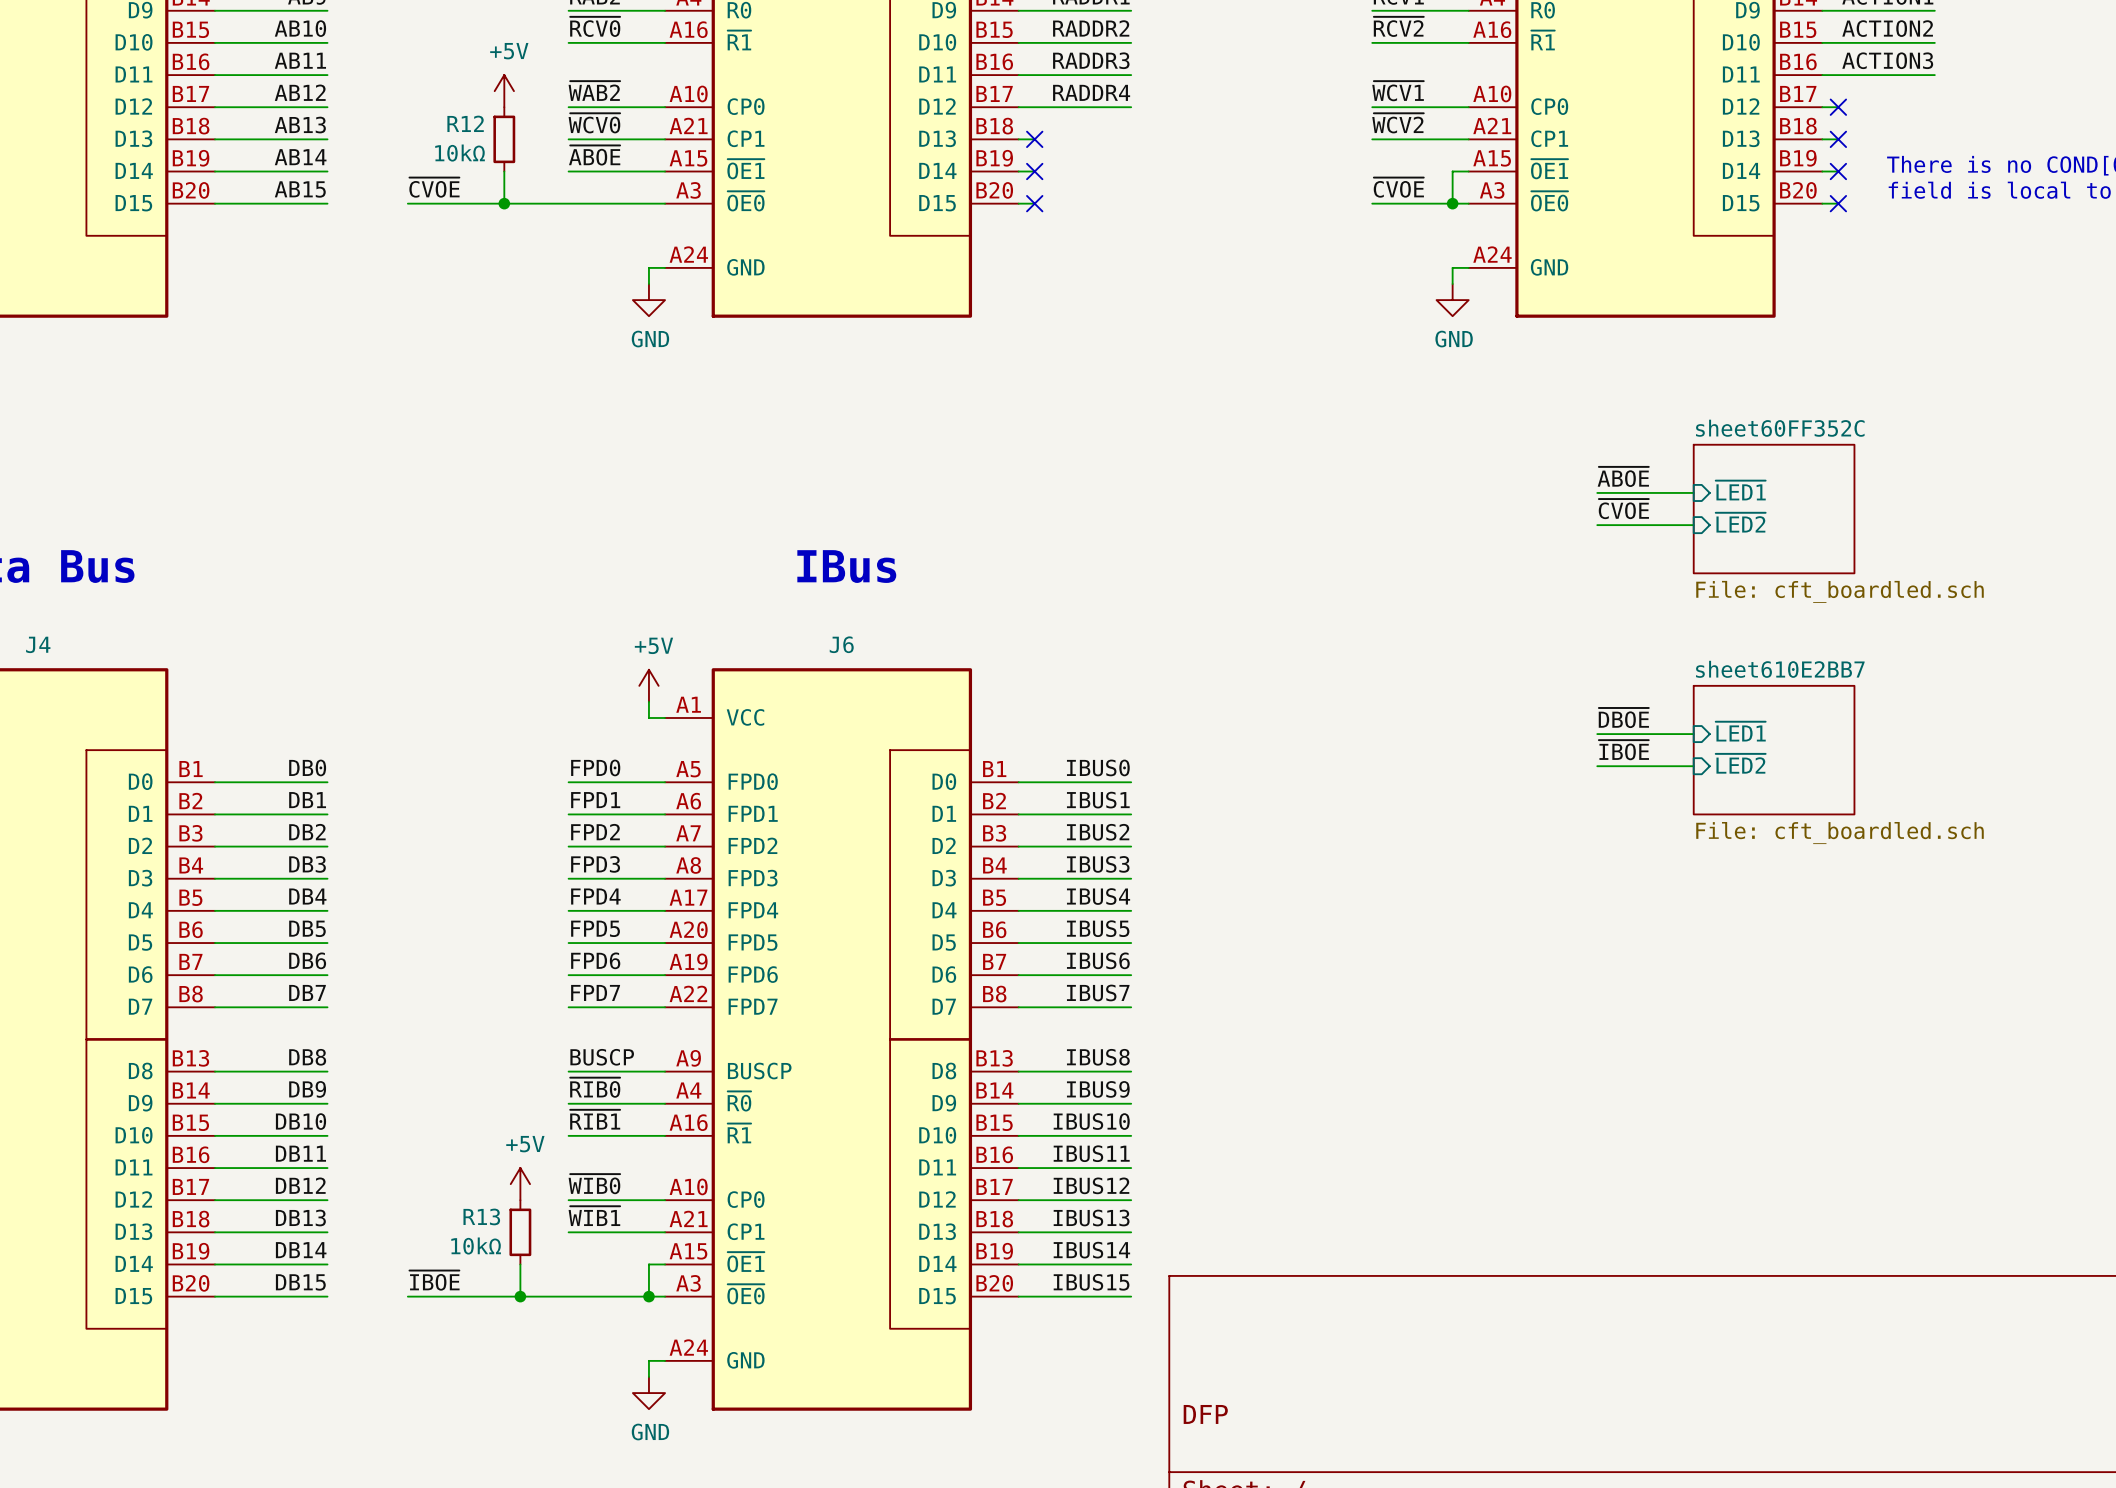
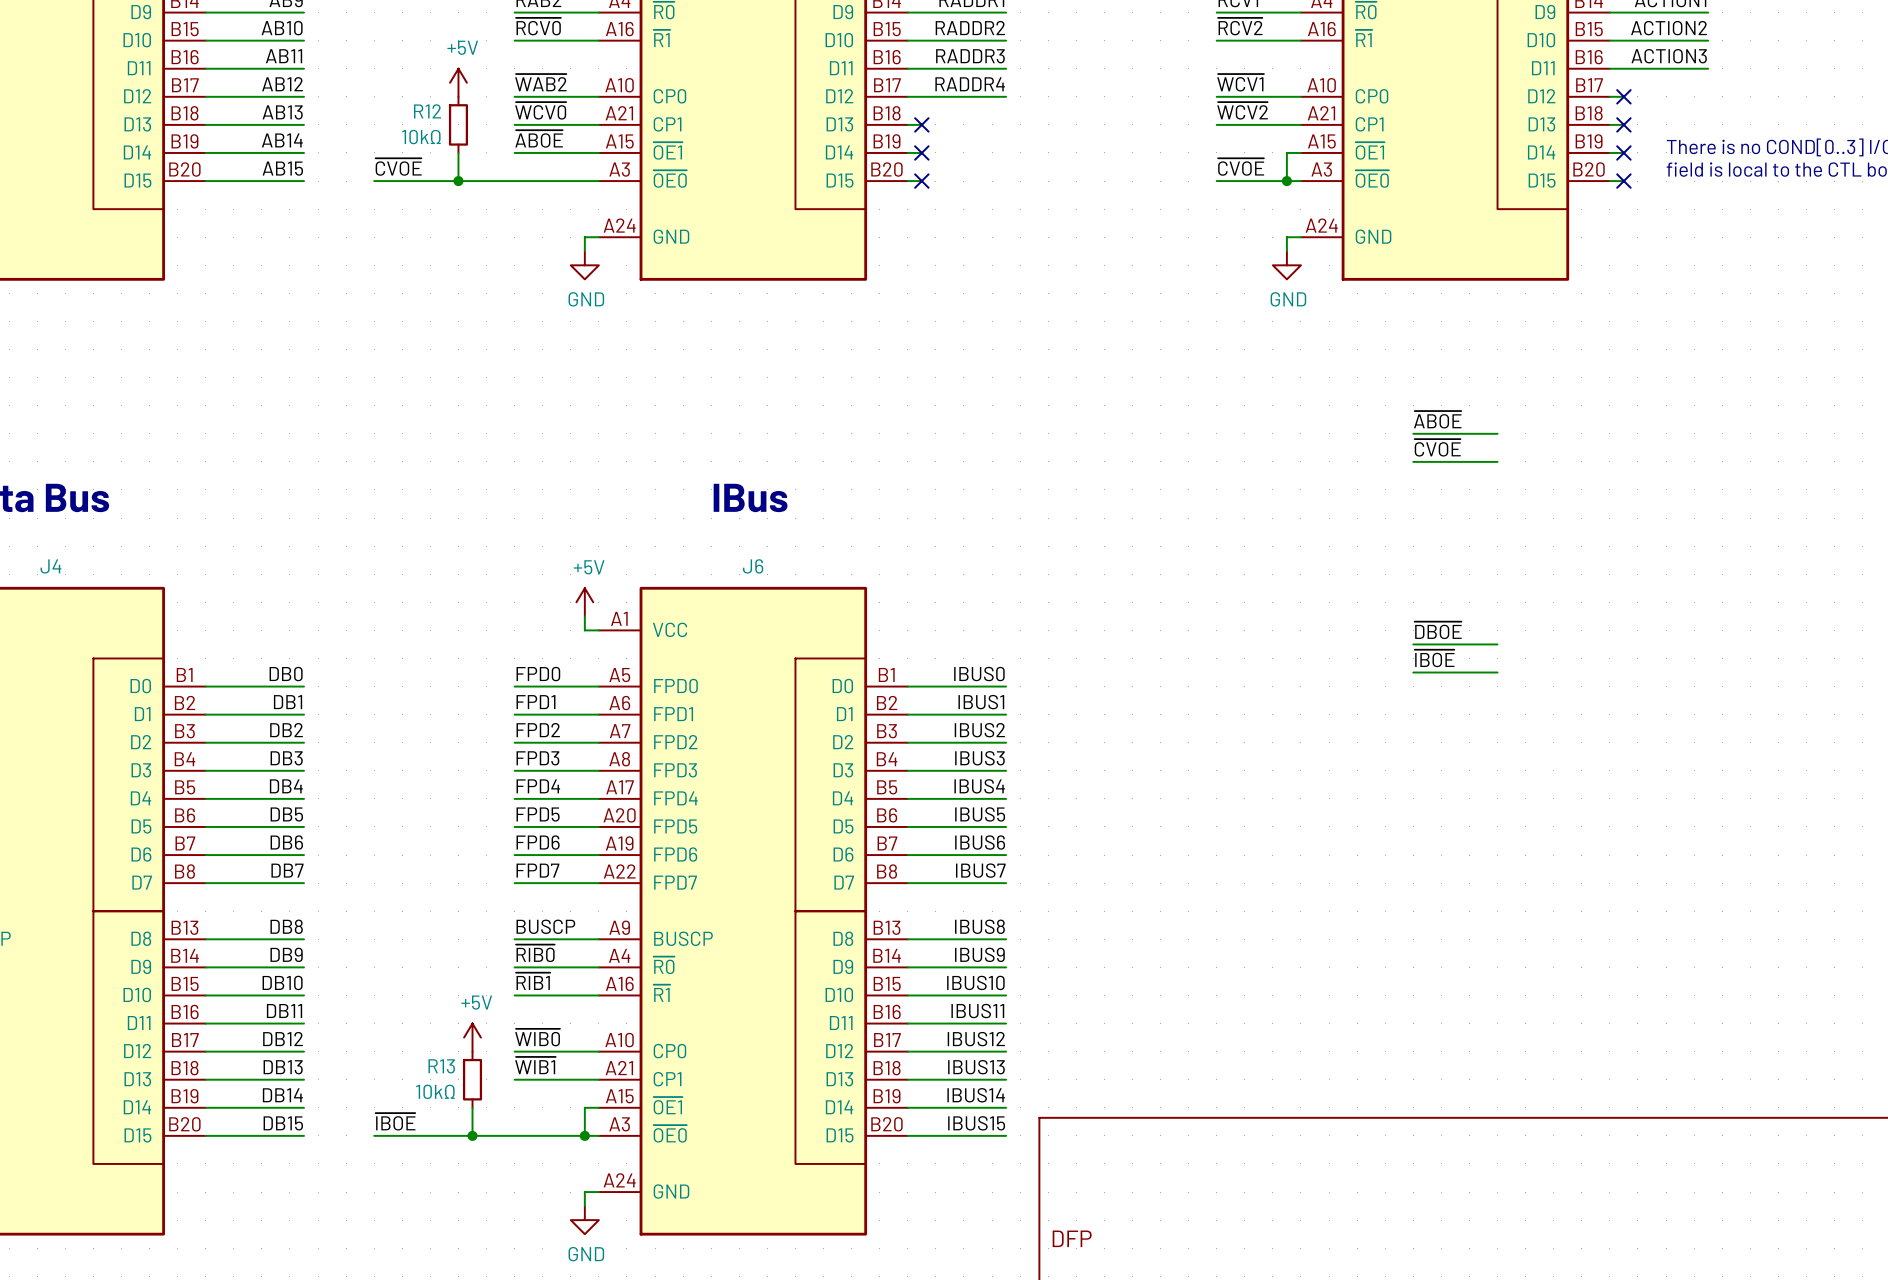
sheet pin: ~{LED1} (1740, 490) -> none
sheet sheet60FF352C: File: cft_boardled.sch (1774, 509) -> none
sheet pin: ~{LED2} (1740, 522) -> none
sheet pin: ~{LED1} (1740, 731) -> none
sheet sheet610E2BB7: File: cft_boardled.sch (1774, 750) -> none
sheet pin: ~{LED2} (1740, 763) -> none

